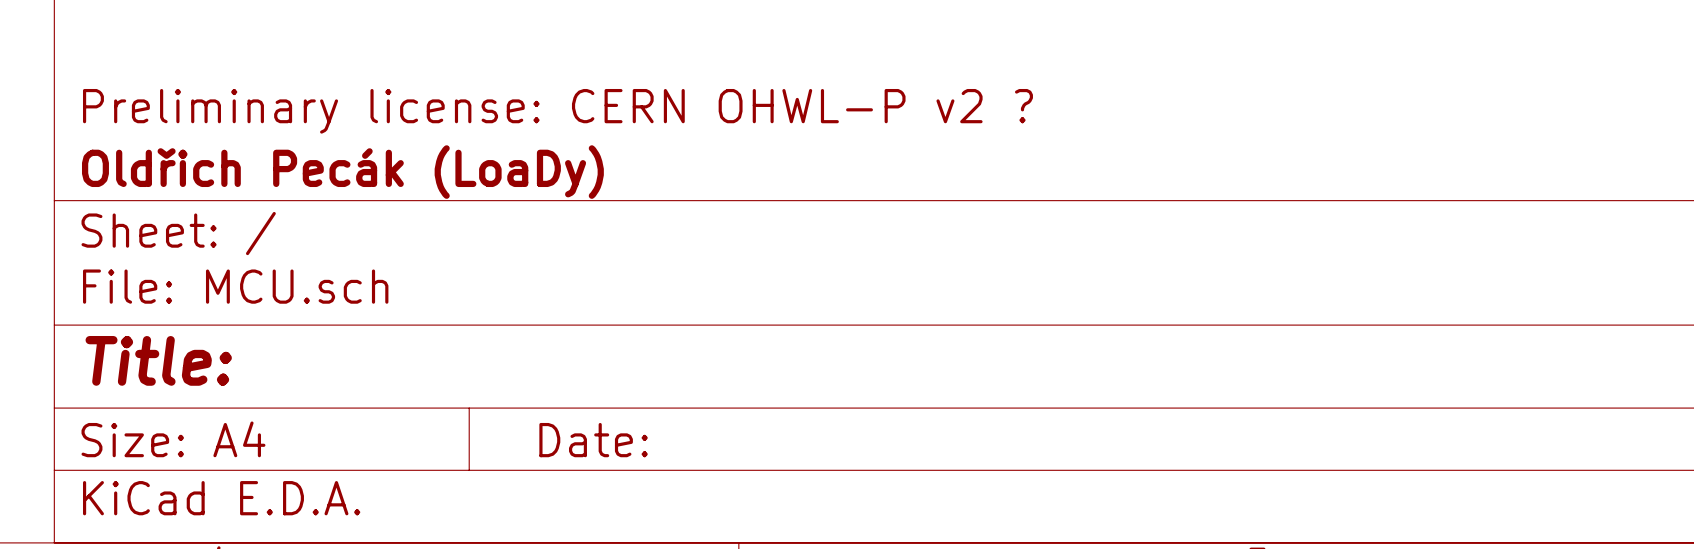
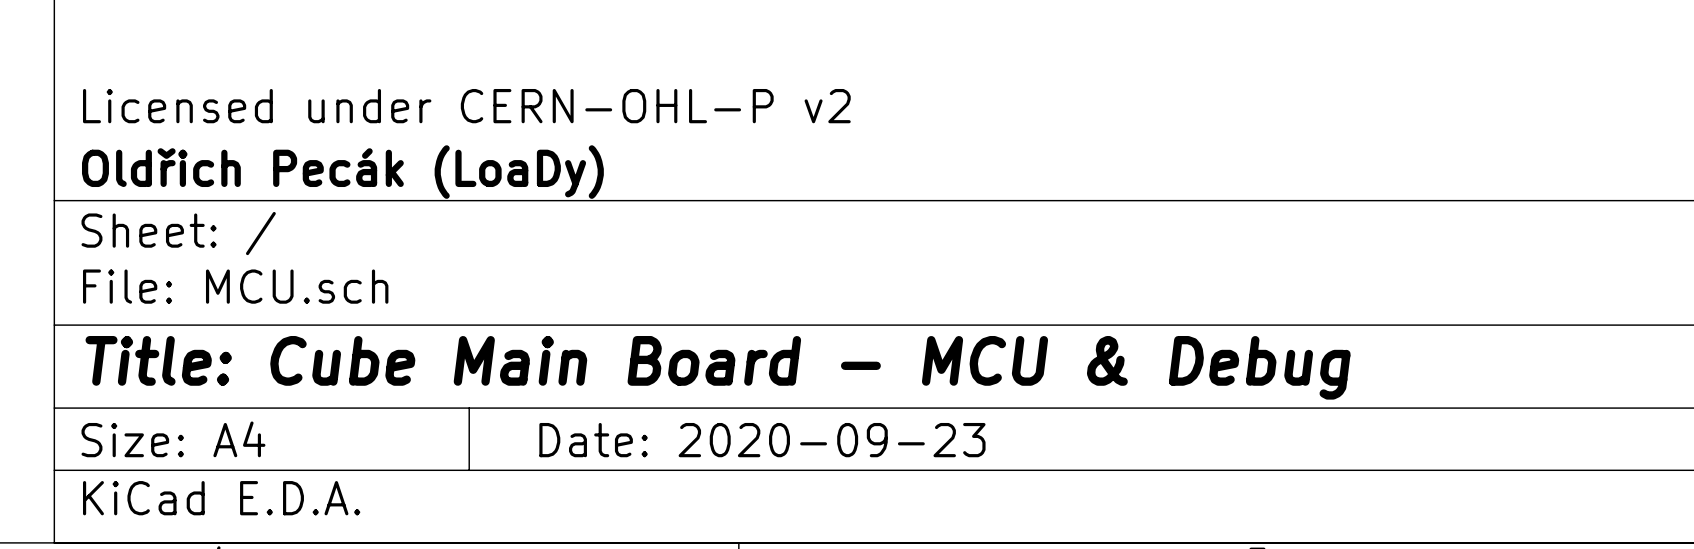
title block: Preliminary license: CERN OHWL-P v2 ? (557, 111) -> Licensed under CERN-OHL-P v2 (466, 106)
title block: Title: (158, 360) -> Title: Cube Main Board - MCU & Debug (718, 367)
title block: Date: (593, 440) -> Date: 2020-09-23 (762, 440)

